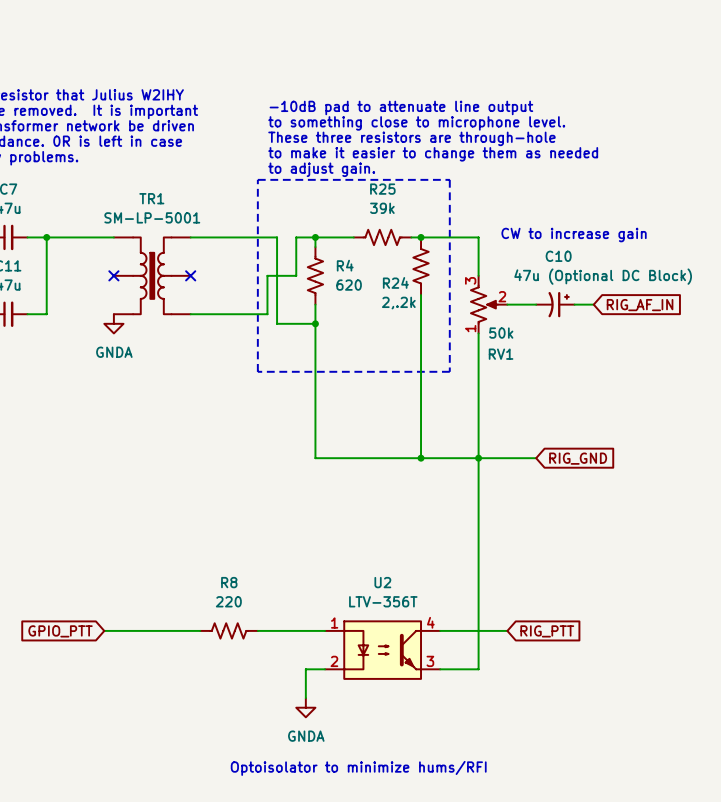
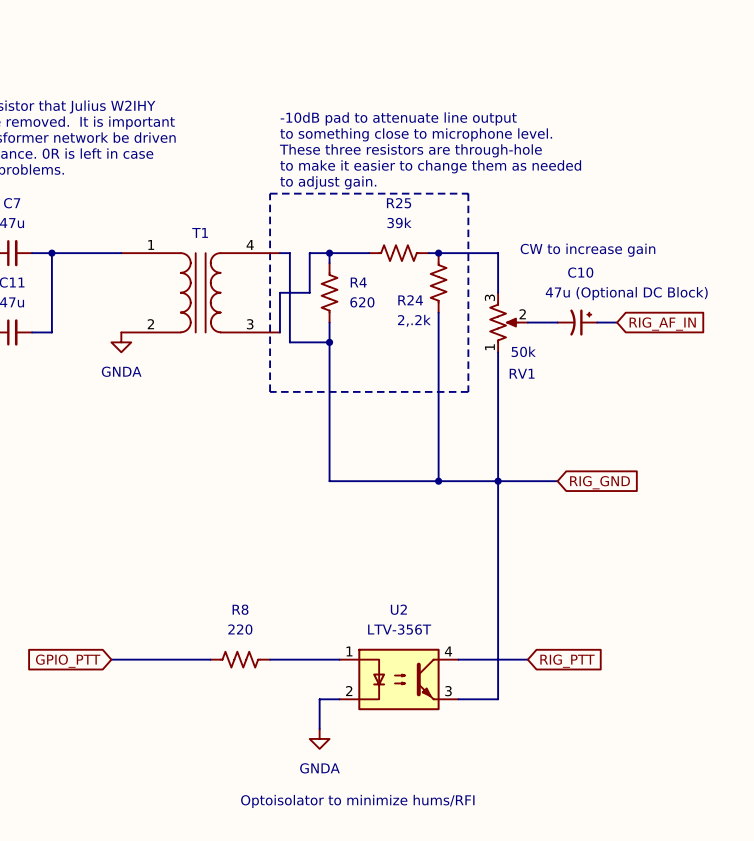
no-connect mark: (113, 275) -> none
TR1: SM-LP-5001 (152, 275) -> none
no-connect mark: (190, 275) -> none
T1: none -> (200, 292)

